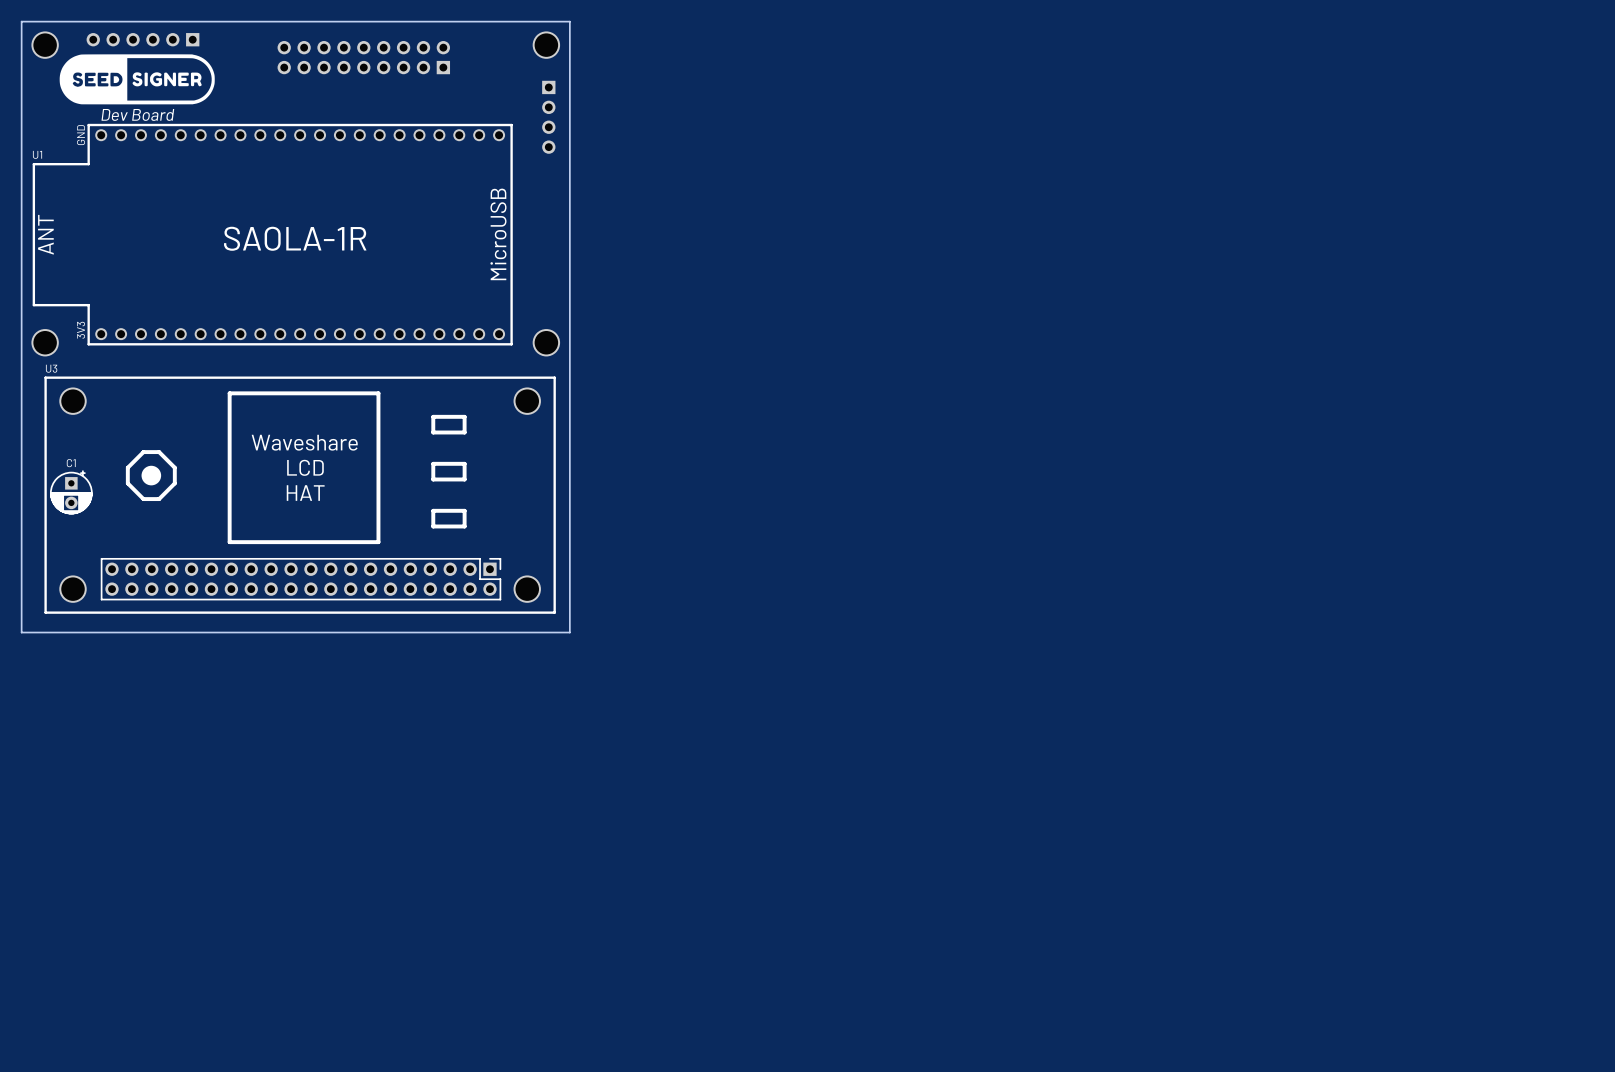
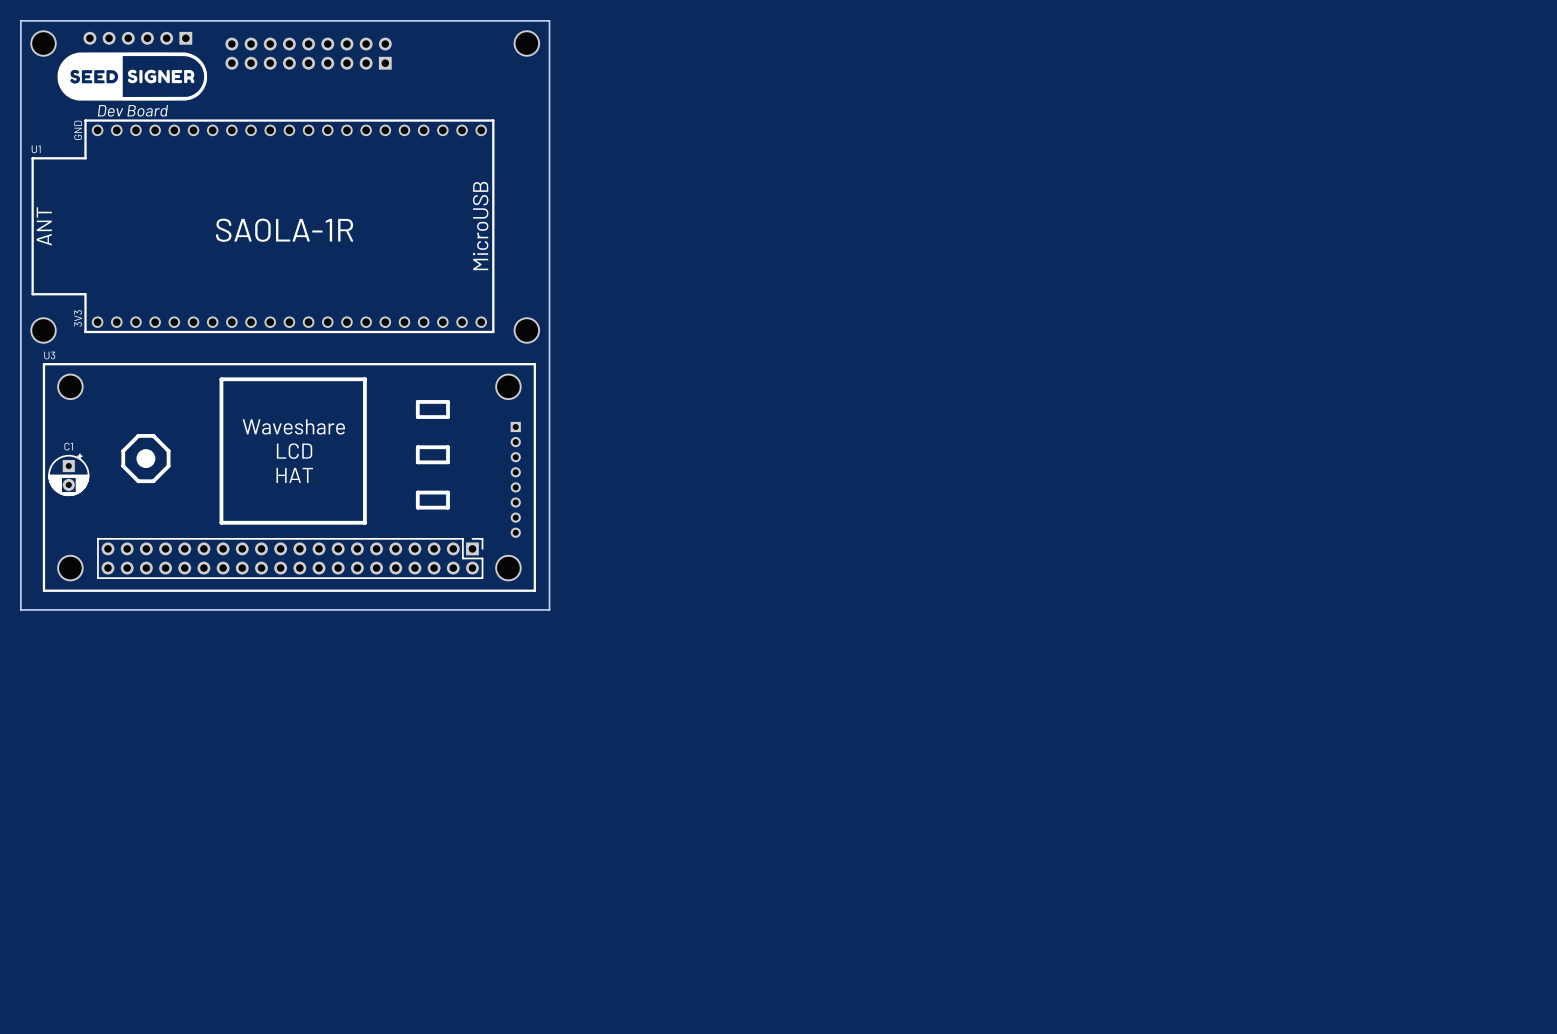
part position: (363, 57) -> (308, 53)
part: (548, 117) -> none
part: none -> (515, 479)

